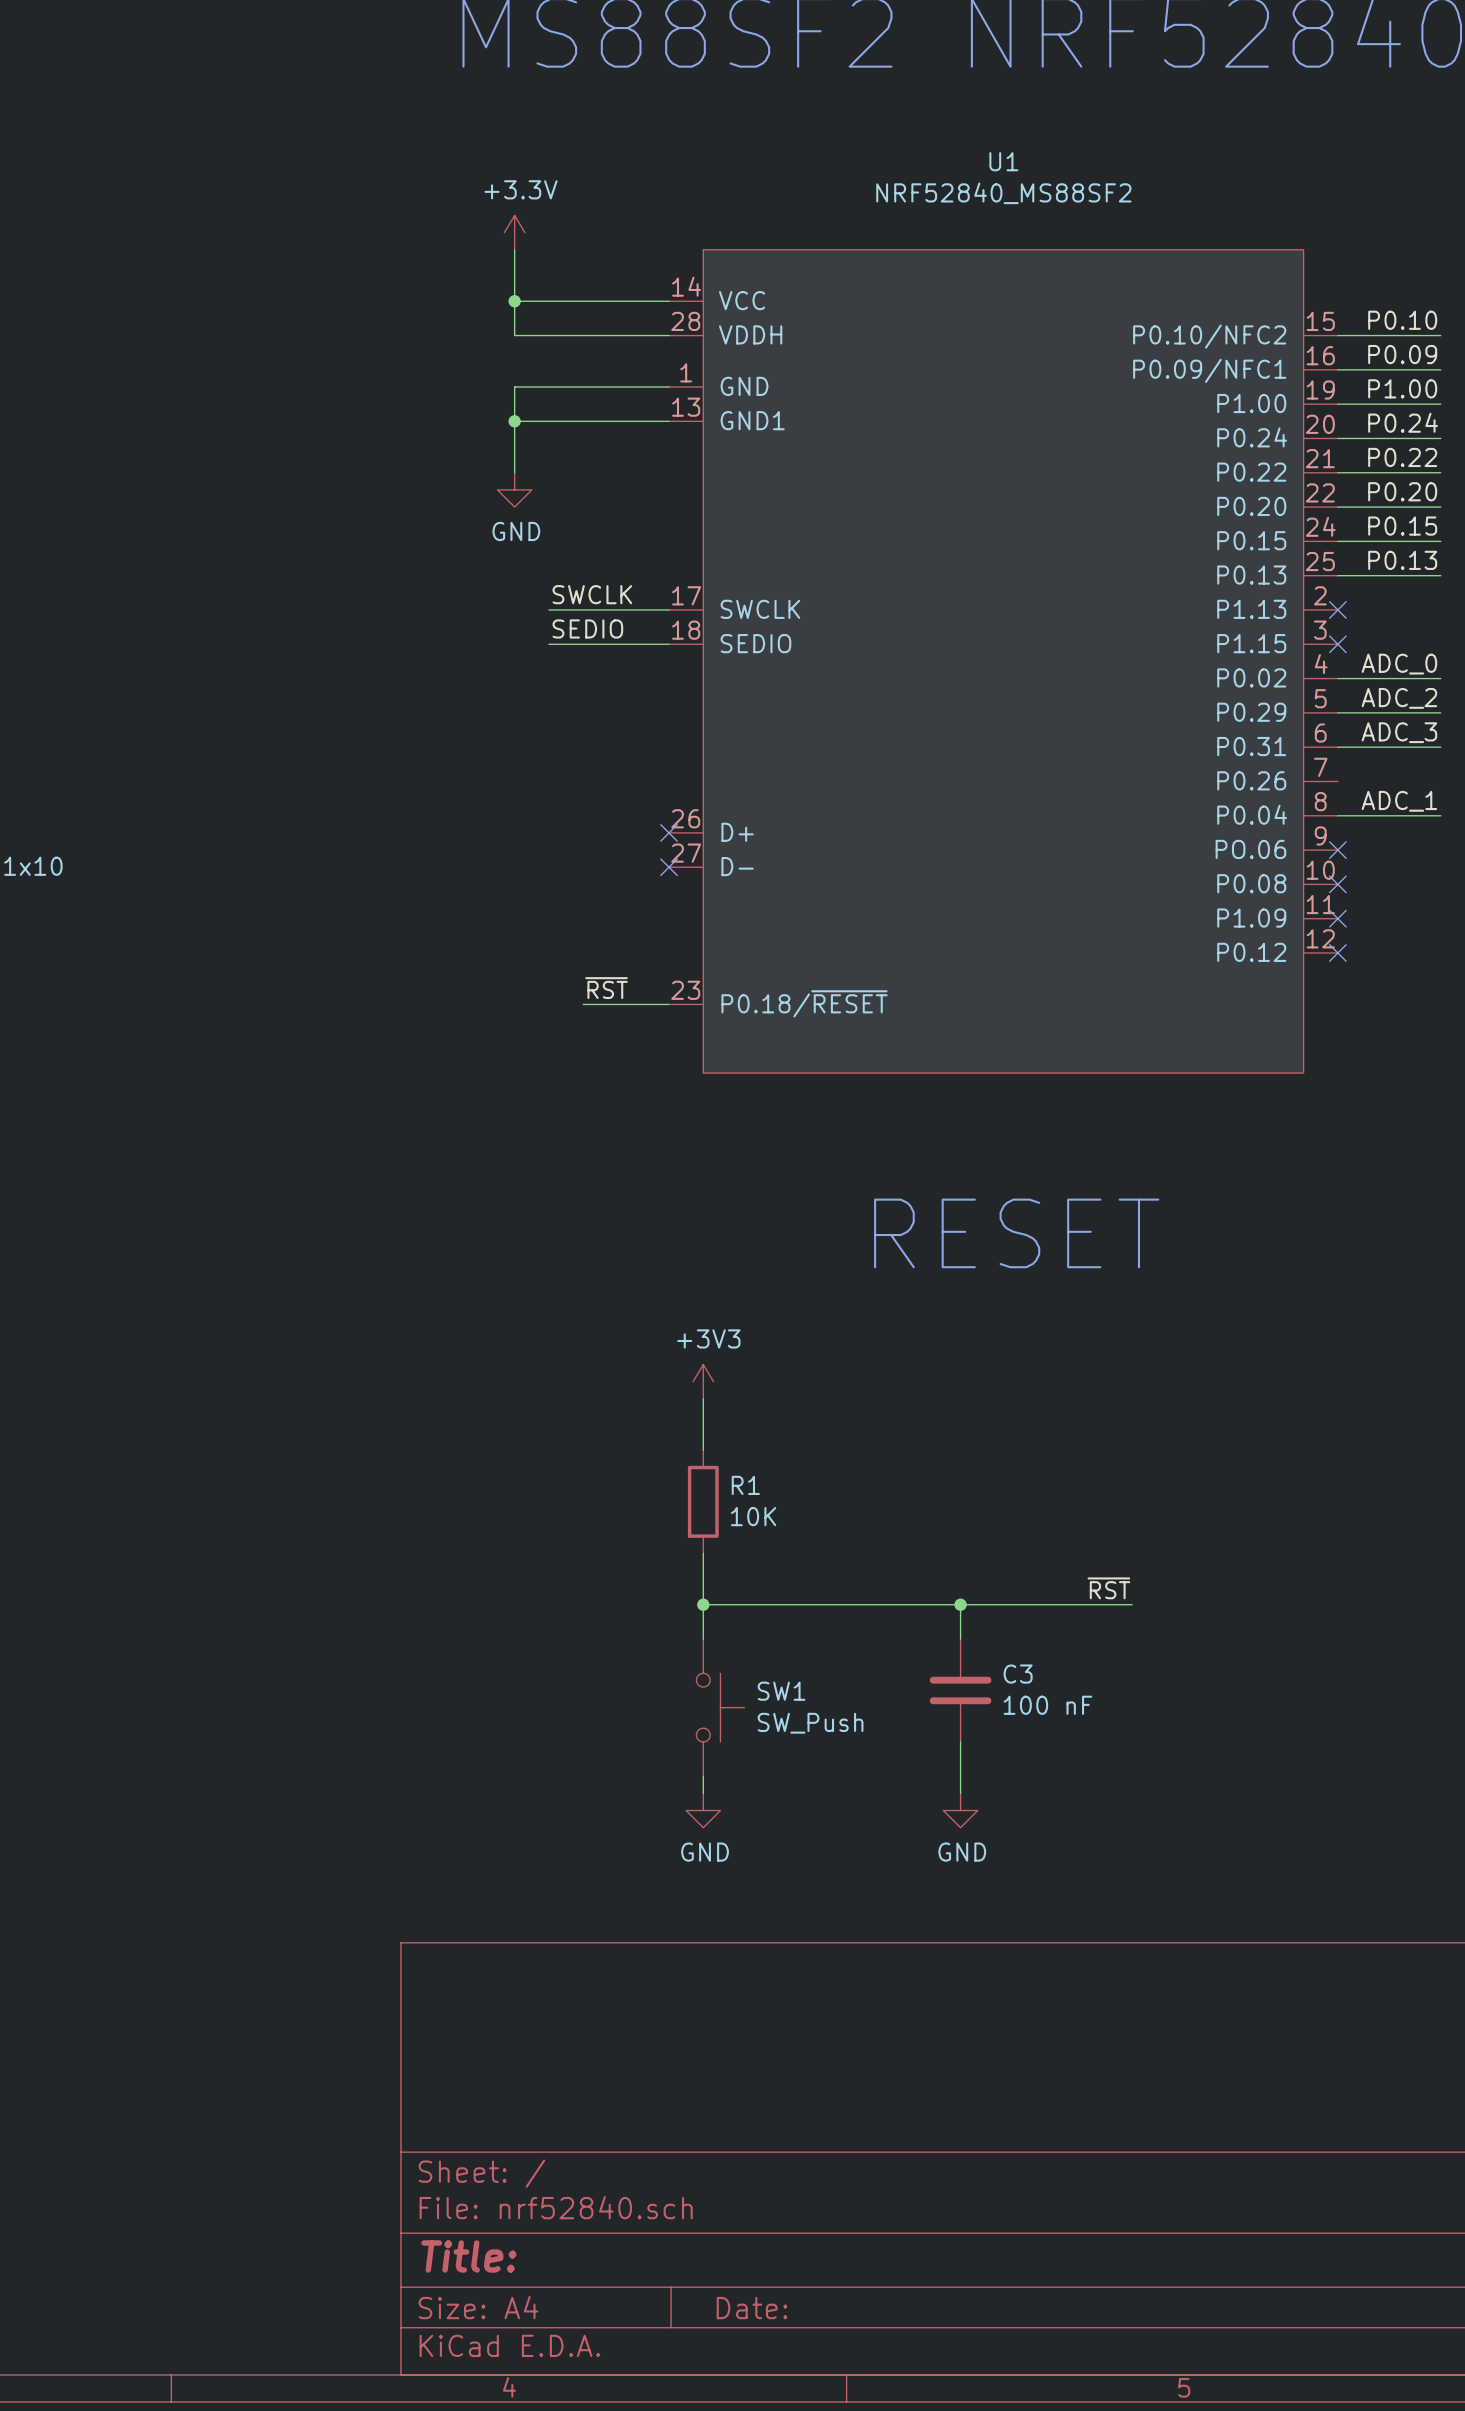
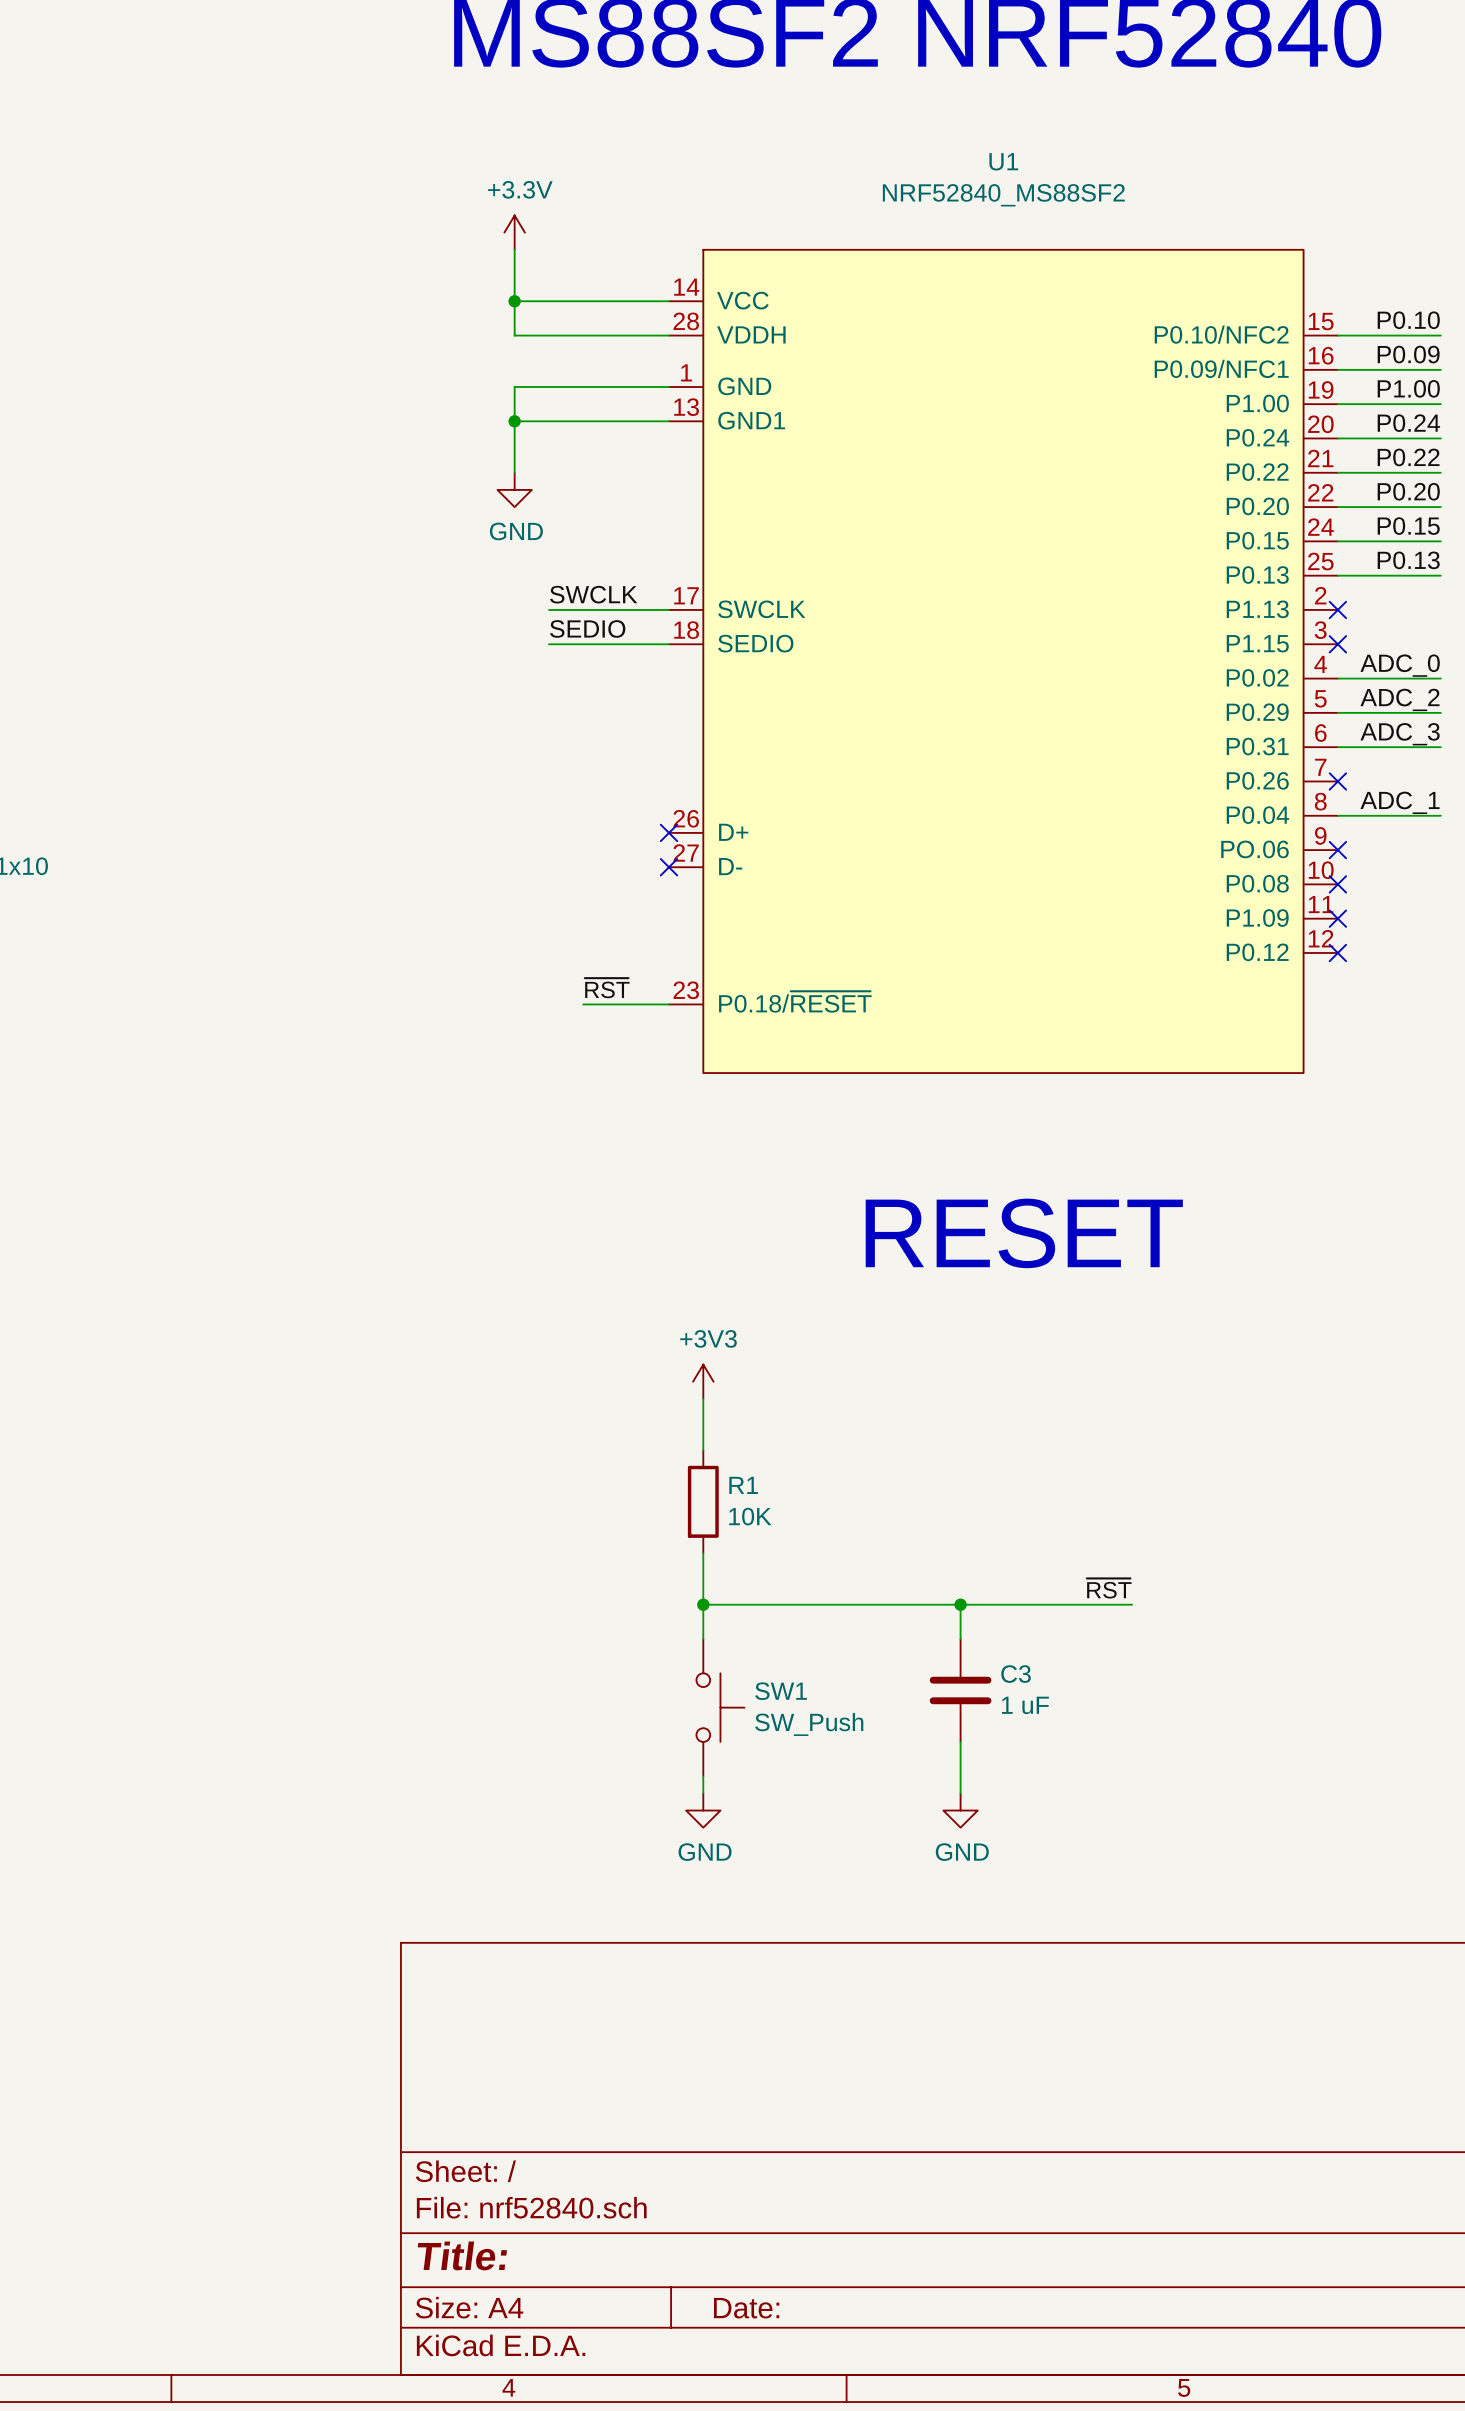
no-connect mark: none -> (1337, 781)
C3 value: 100 nF (1047, 1705) -> 1 uF (1025, 1705)

